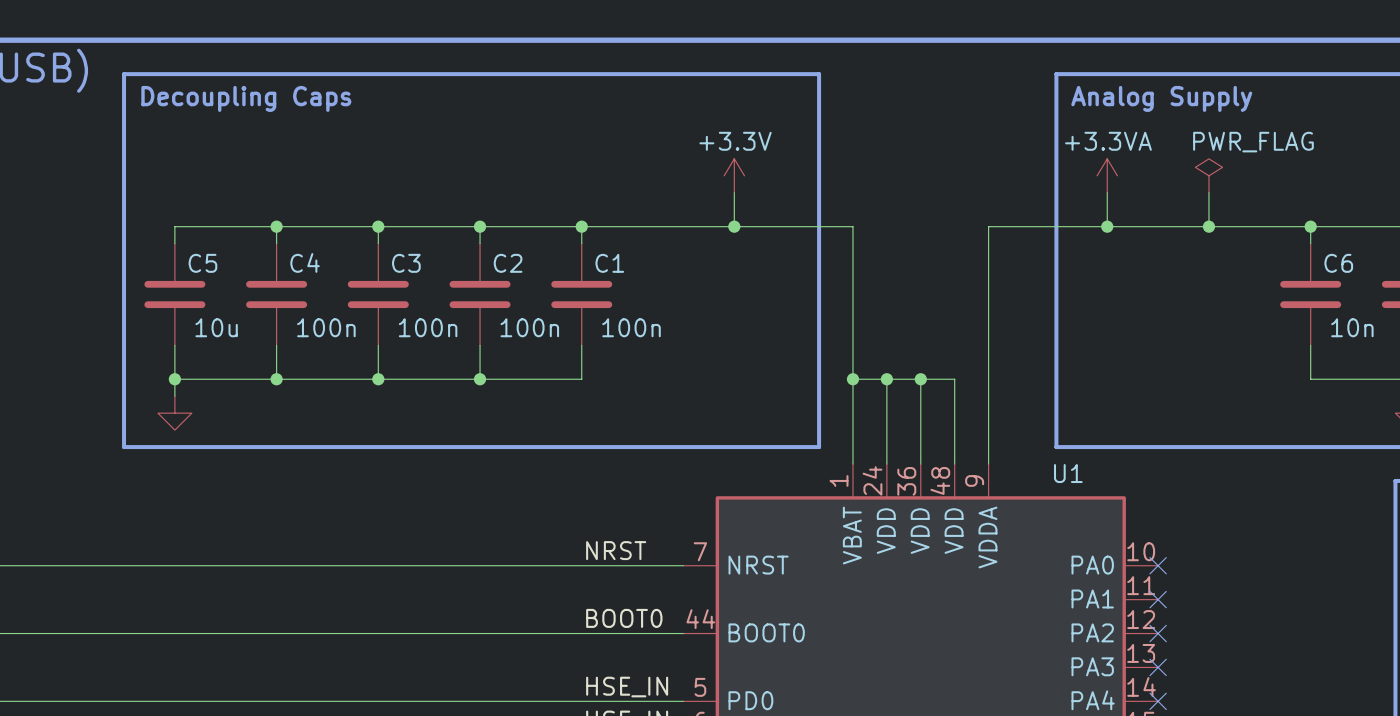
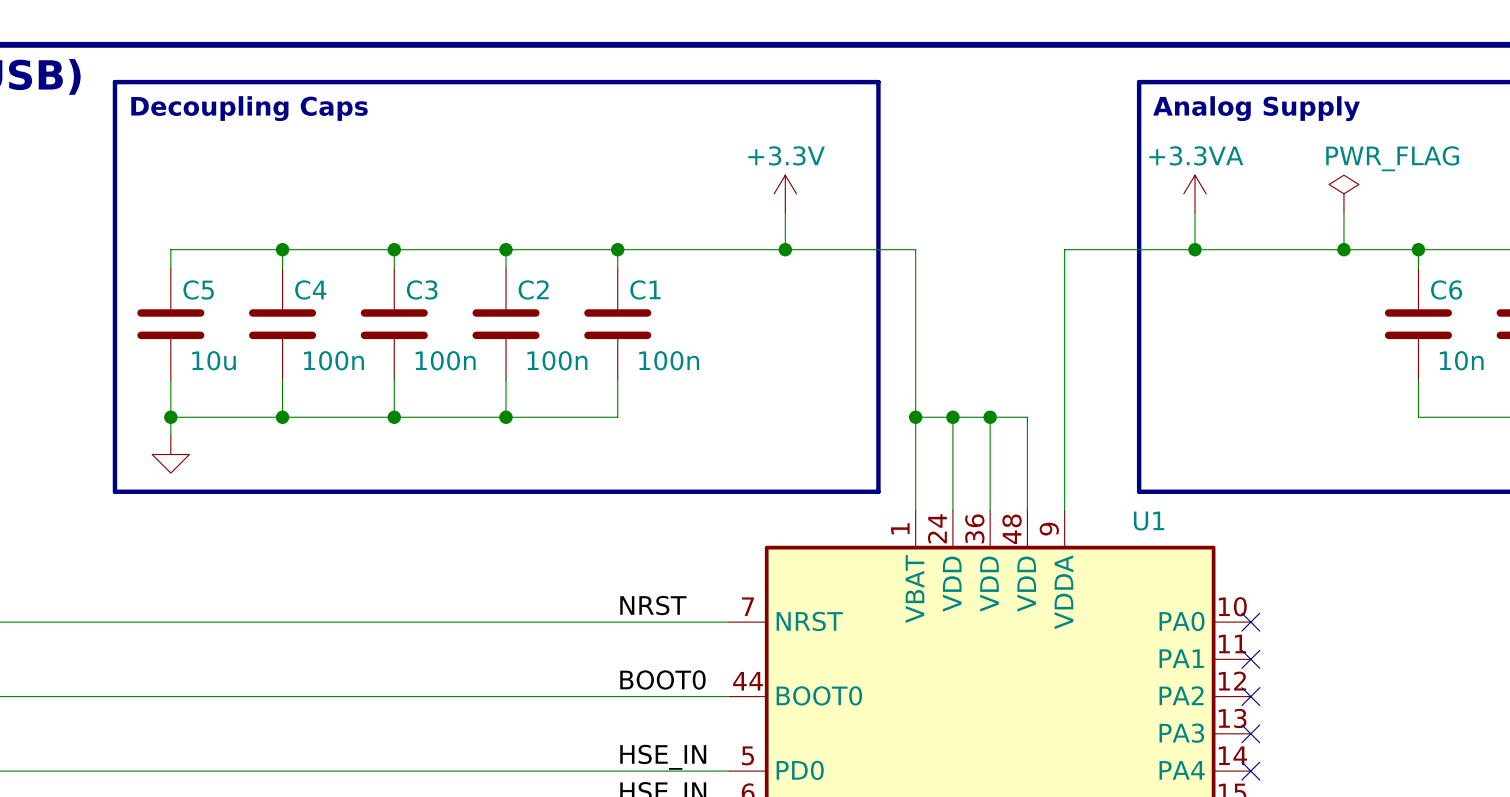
power symbol position: PWR_FLAG (1208, 175) -> PWR_FLAG (1343, 193)
wire: (1208, 192) (1208, 226) -> (1343, 212) (1343, 249)
junction position: (1208, 226) -> (1343, 249)

